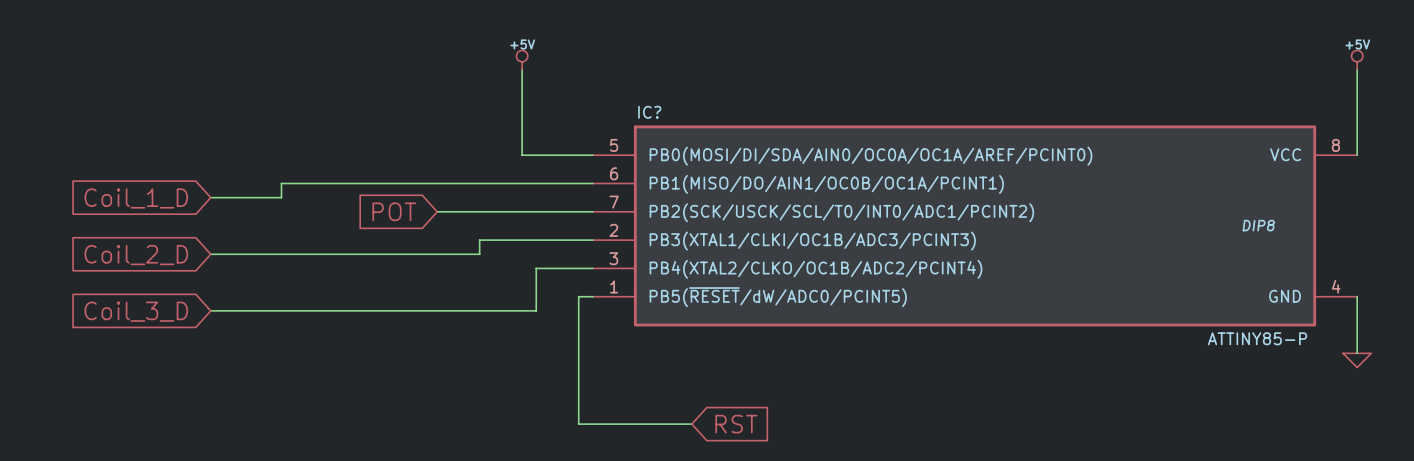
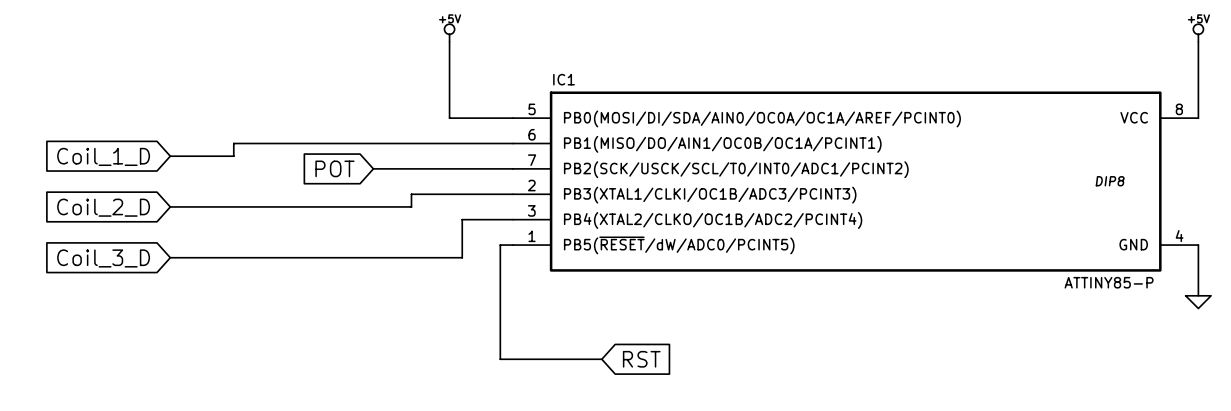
IC? name: IC? (649, 112) -> IC1 (564, 79)

